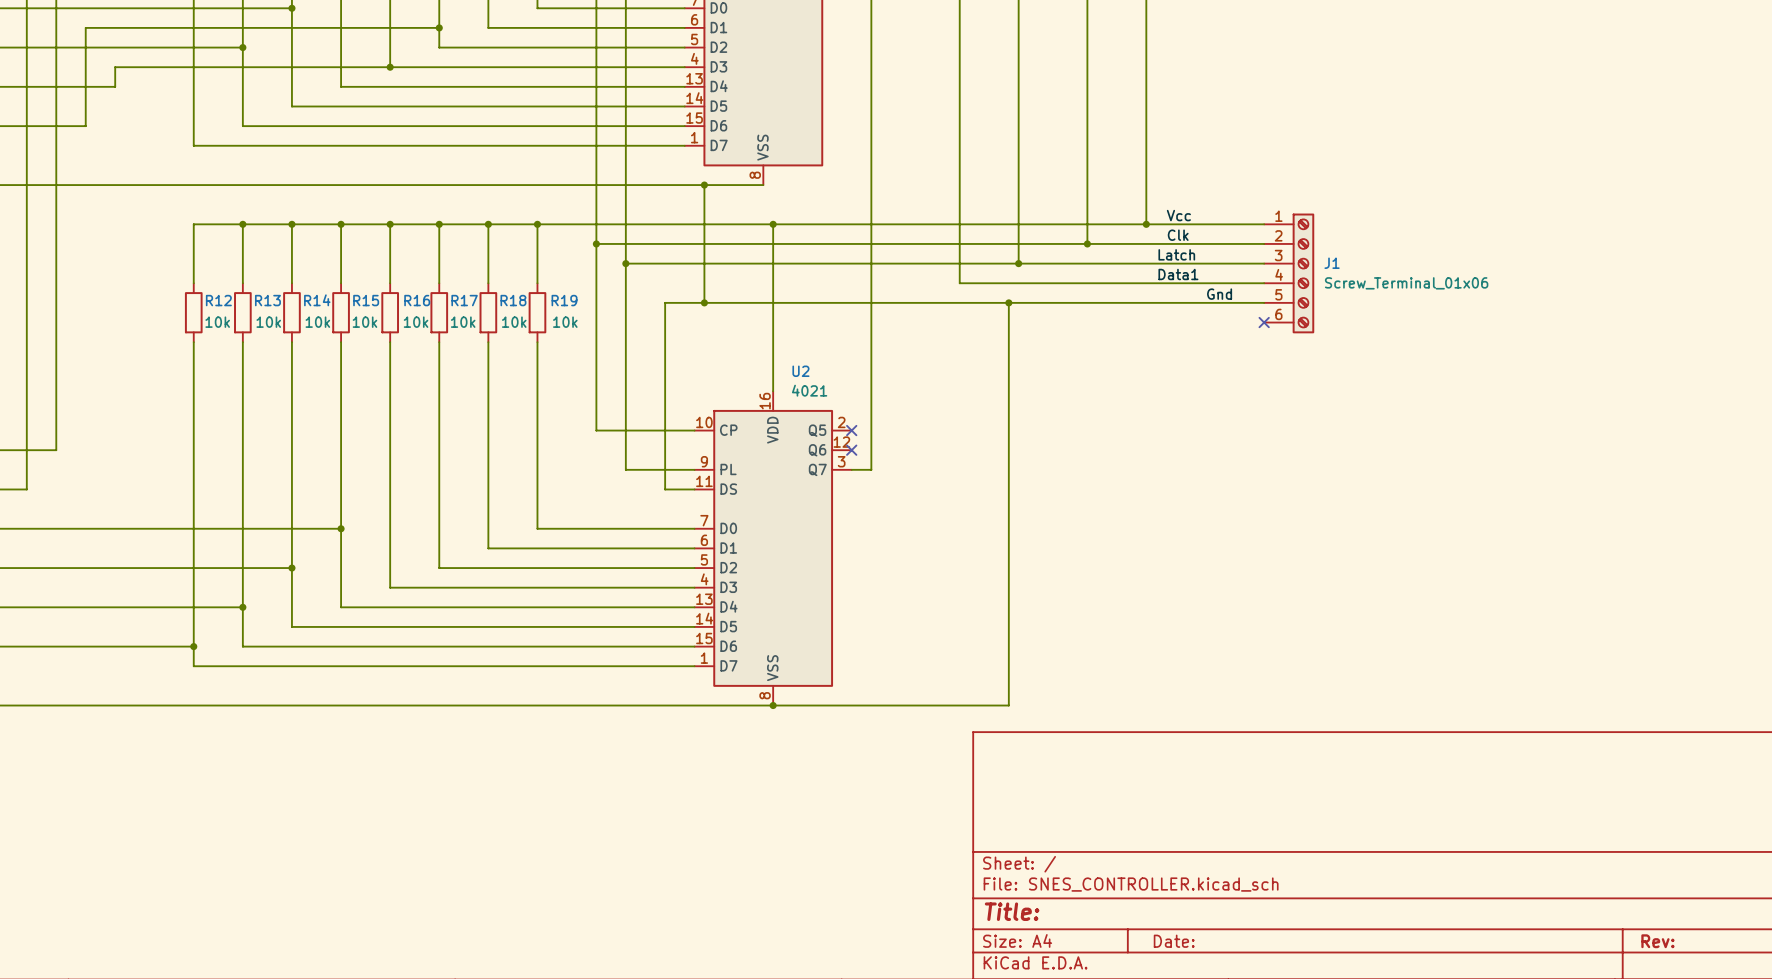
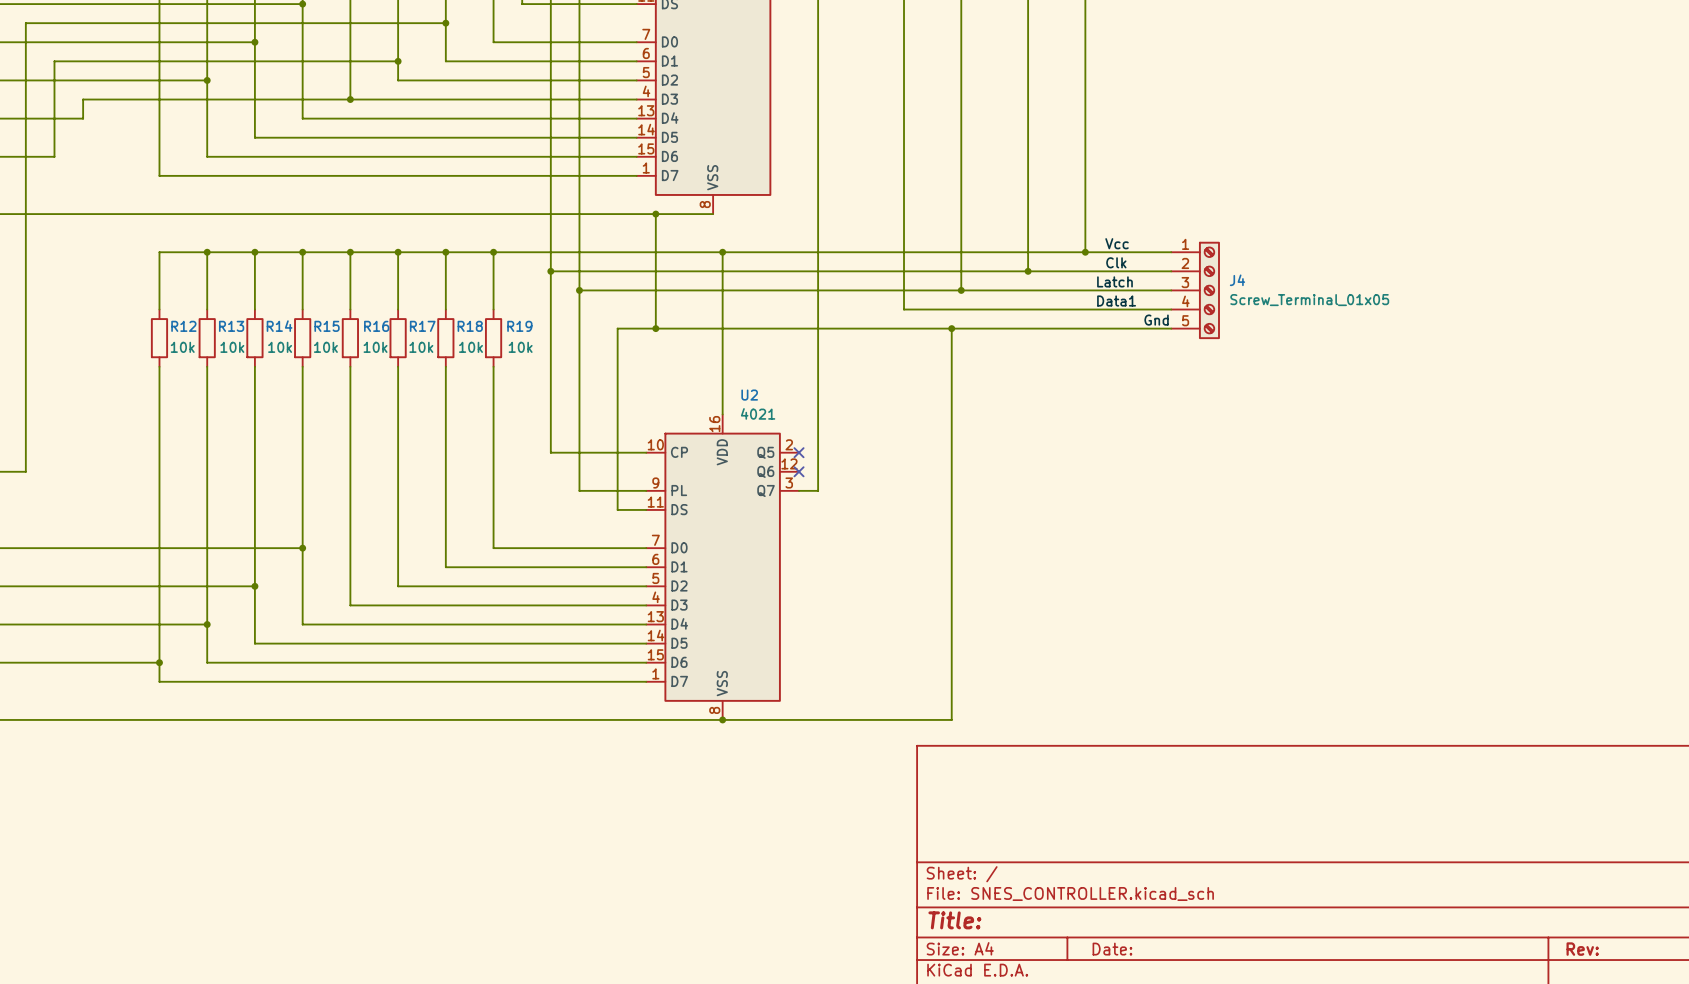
J4: none -> Screw_Terminal_01x05 (1195, 290)
J1: Screw_Terminal_01x06 (1289, 273) -> none
no-connect mark: (1264, 322) -> none

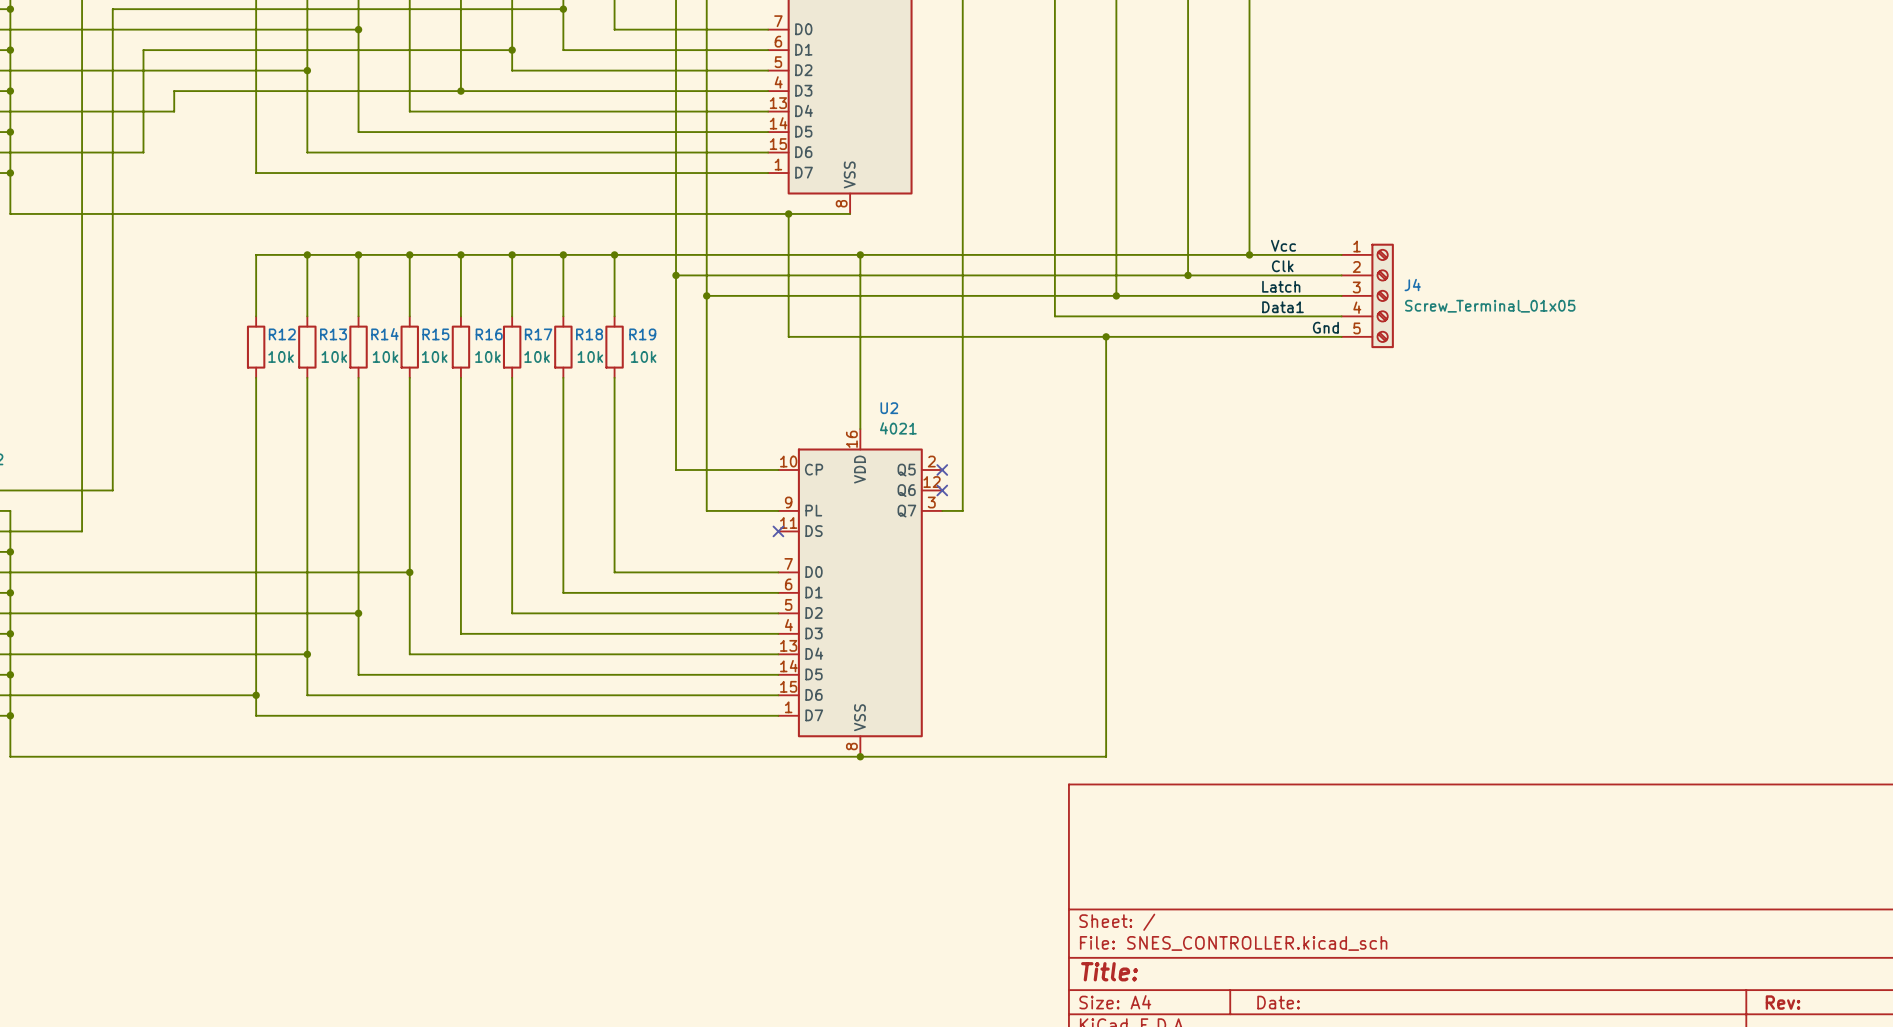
wire: (655, 328) (617, 328) (617, 509) (646, 509) -> none
junction: (655, 328) -> none
no-connect mark: none -> (778, 531)

